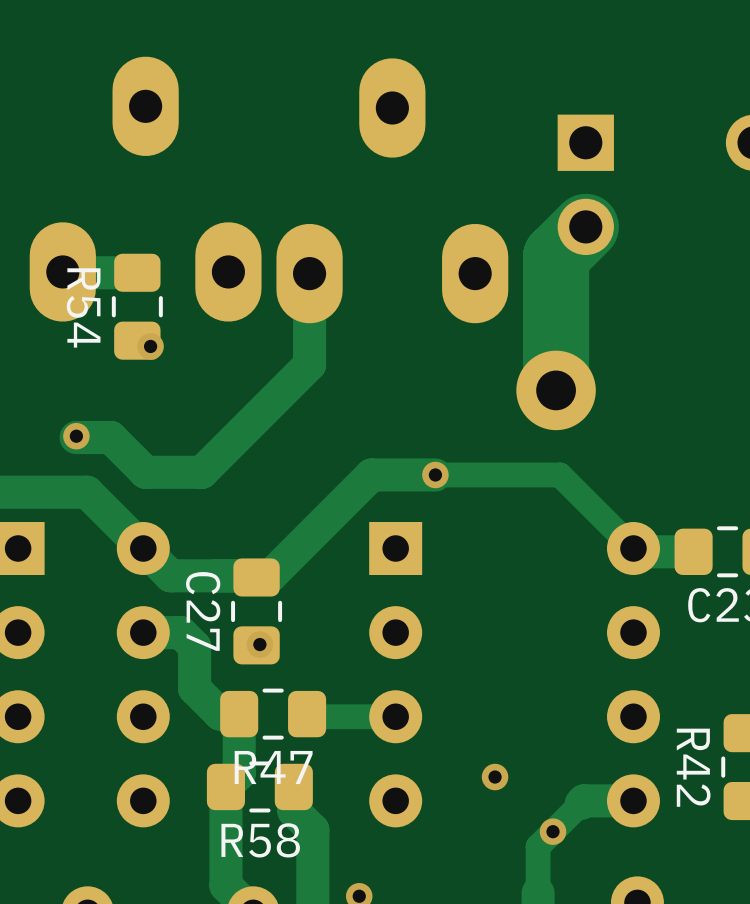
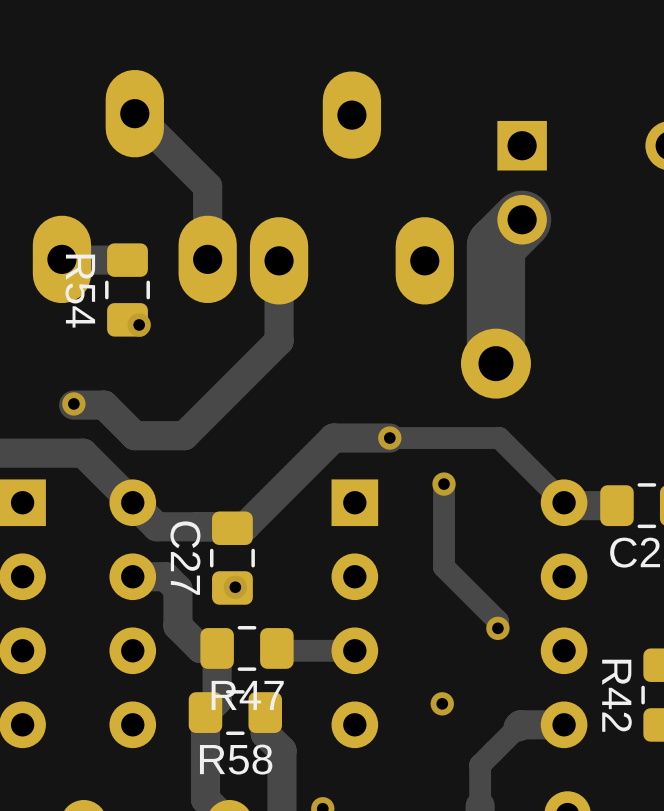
track: none -> (134, 113) (207, 186) (207, 259)
track: none -> (444, 484) (444, 567) (497, 621) (497, 628)
via: none -> (444, 484)
via position: (553, 831) -> (497, 628)

